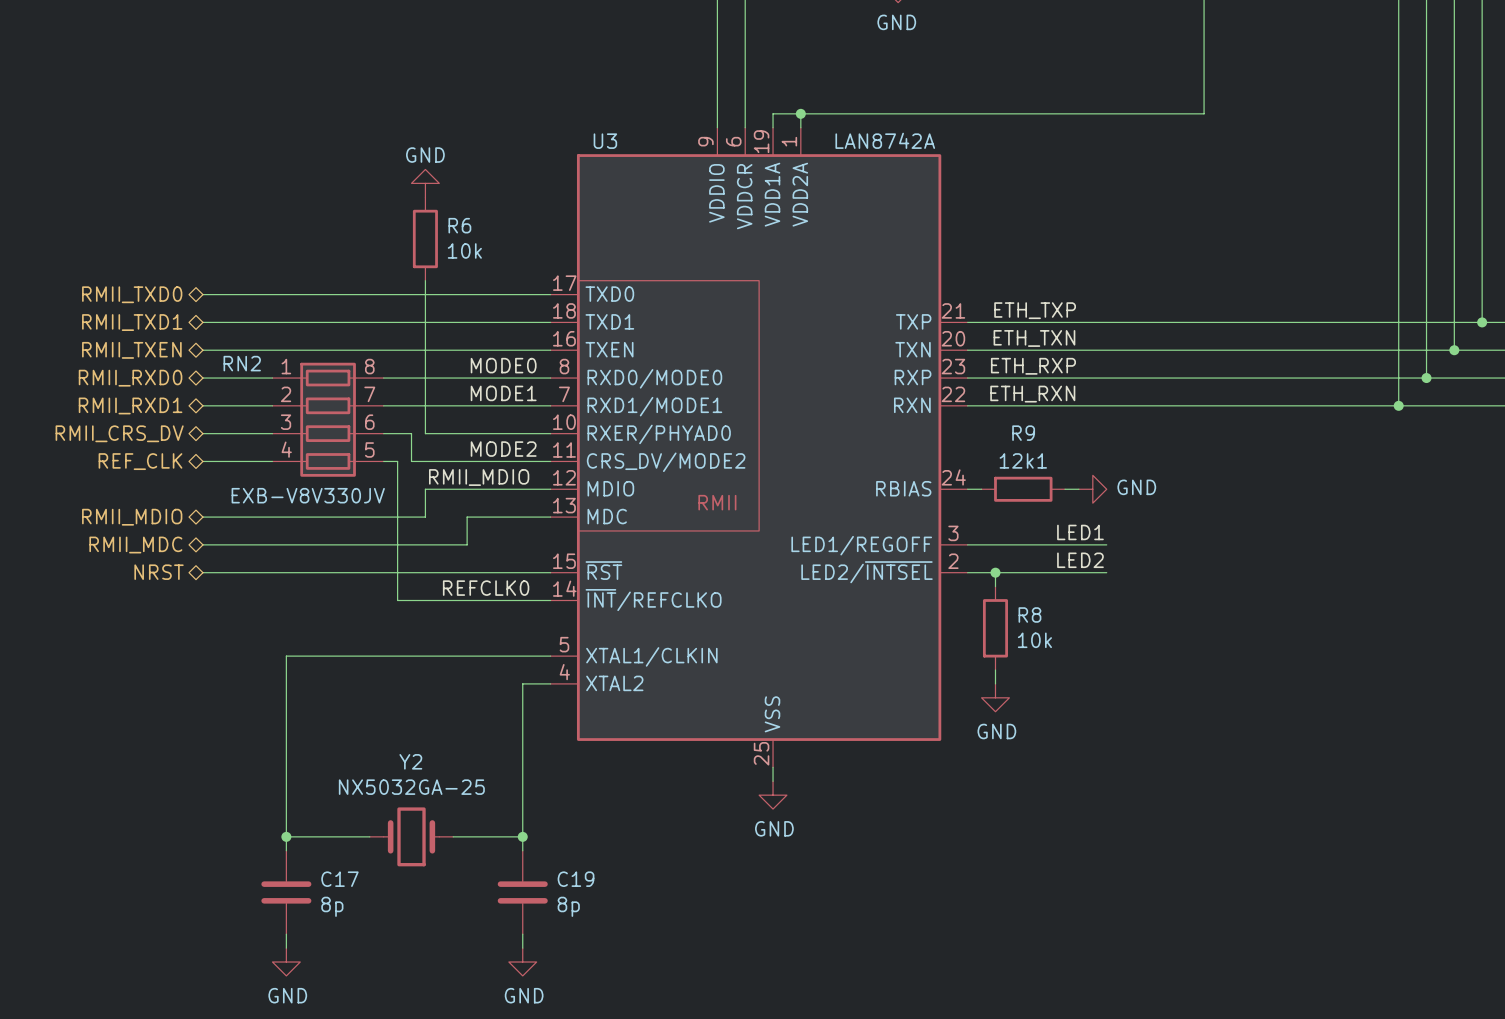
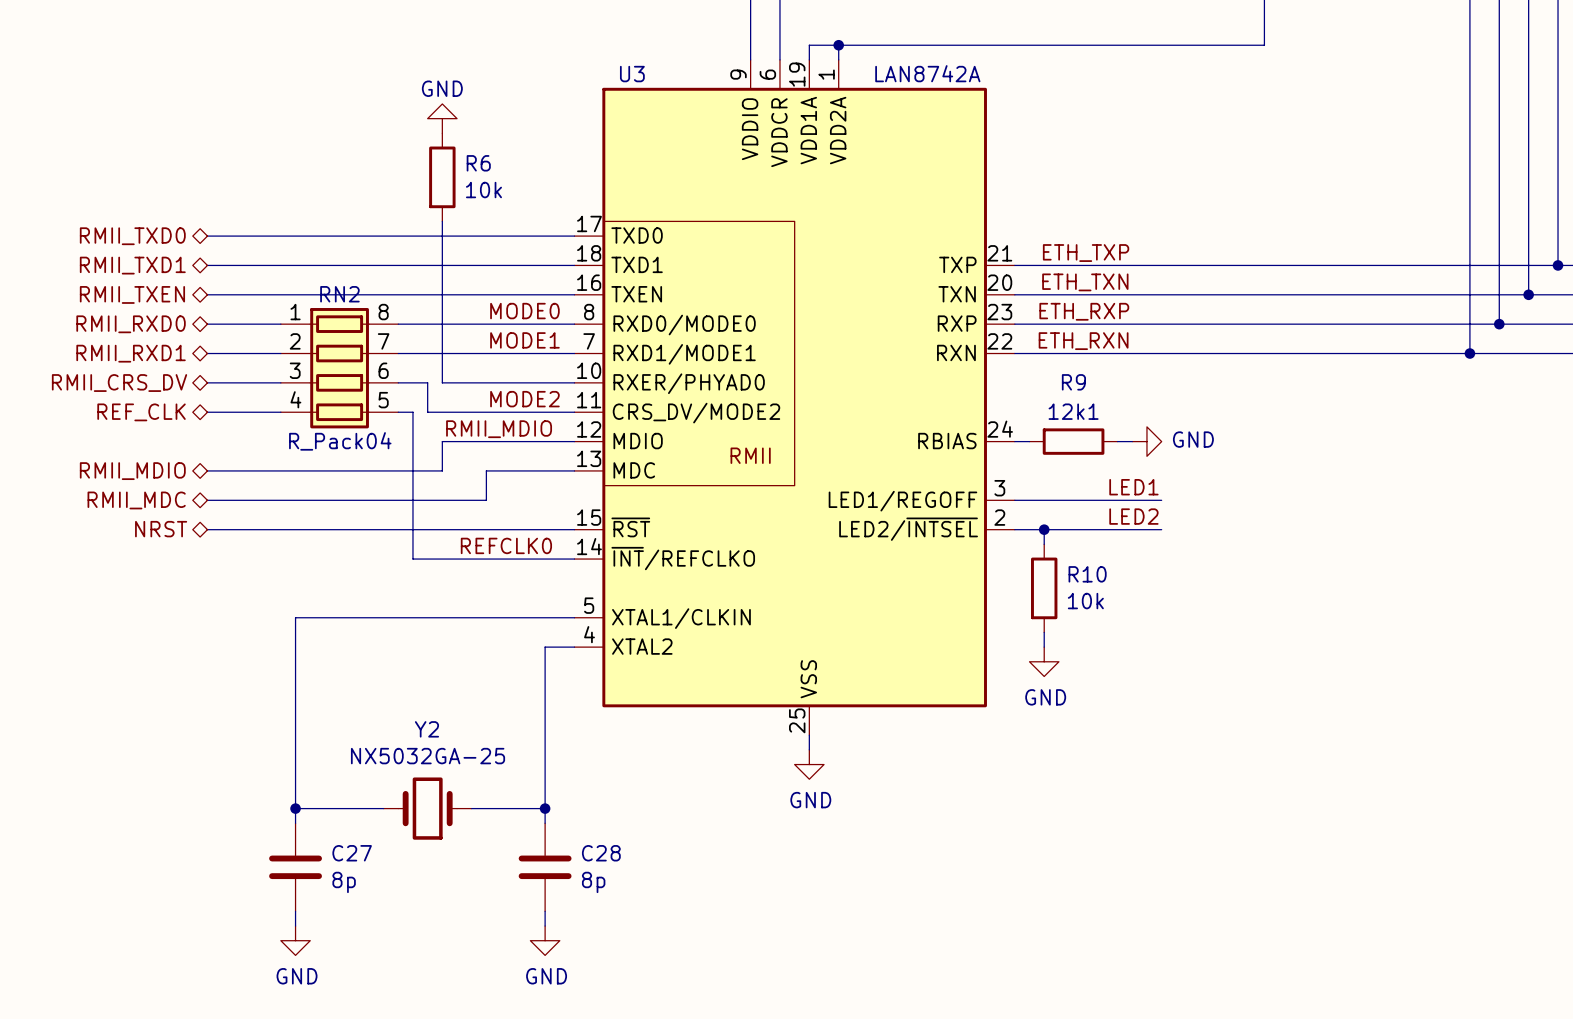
RN2 name position: RN2 (242, 363) -> RN2 (339, 294)
RN2 value: EXB-V8V330JV (308, 495) -> R_Pack04 (340, 441)
R8 name: R8 (1029, 614) -> R10 (1087, 574)
C17 name: C17 (339, 879) -> C27 (352, 853)
C19 name: C19 (576, 879) -> C28 (601, 853)

